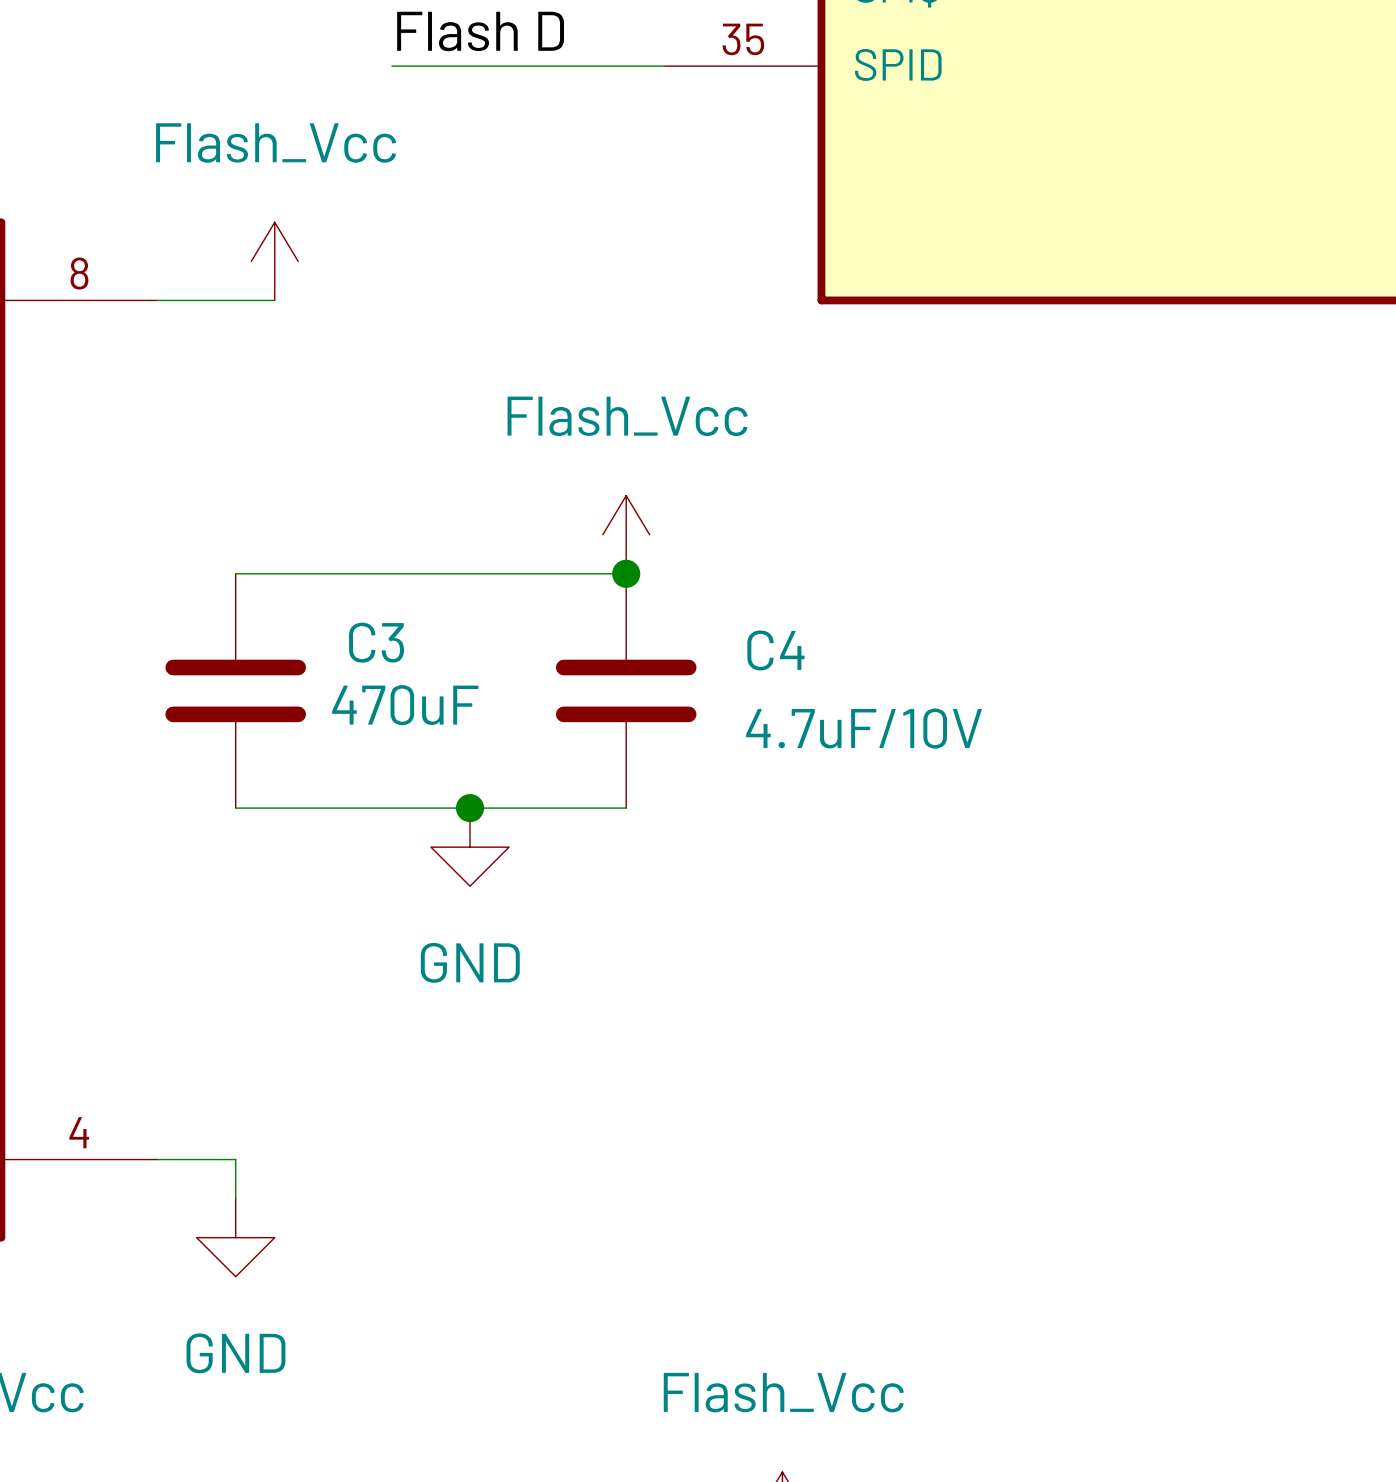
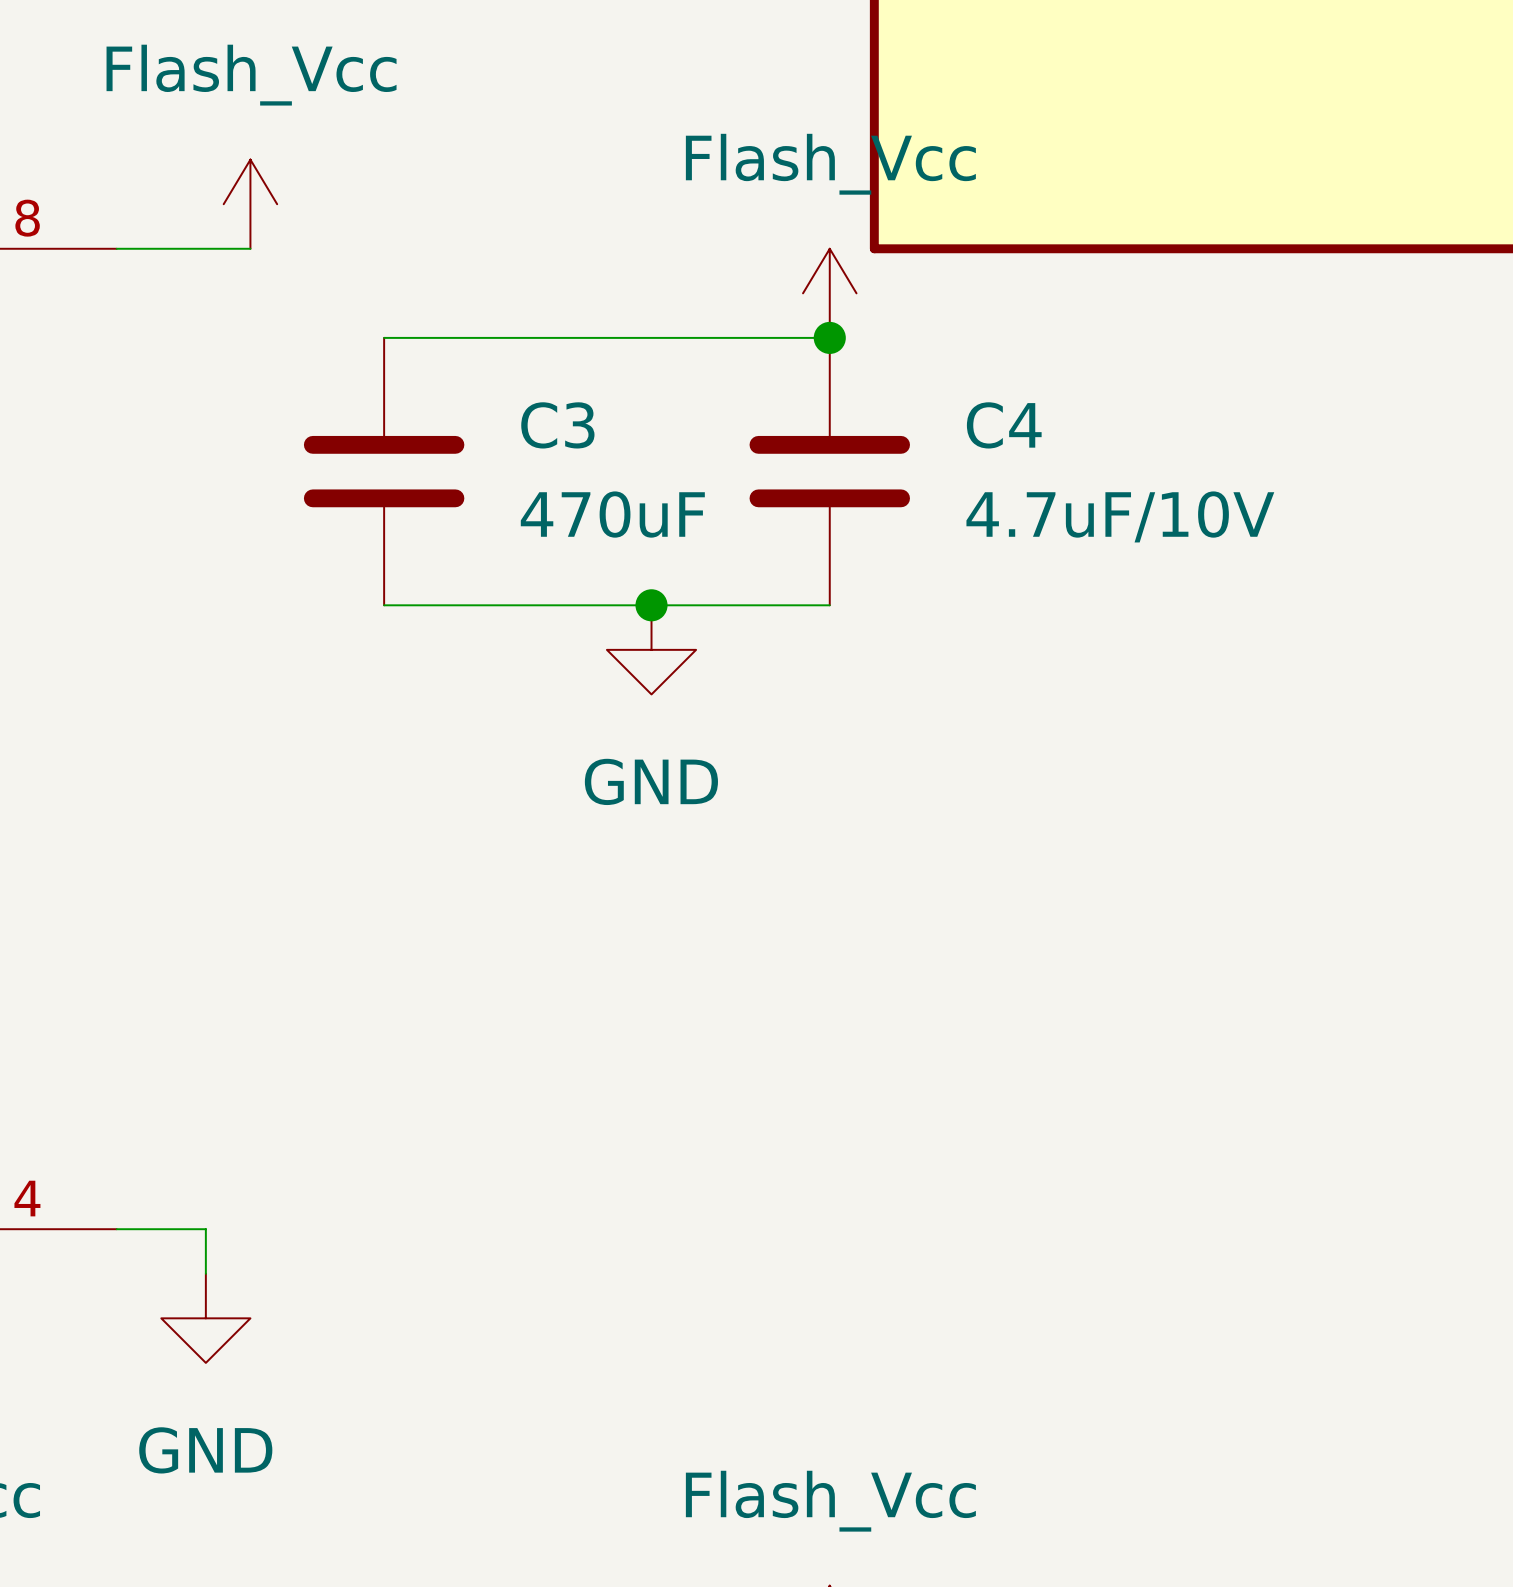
junction: none -> (829, 337)
power symbol position: Flash_Vcc (626, 534) -> Flash_Vcc (829, 293)
wire: (235, 573) (626, 573) -> (384, 337) (829, 337)
junction position: (626, 573) -> (651, 605)
C3 name position: C3 (376, 642) -> C3 (557, 425)
C3 position: (235, 690) -> (384, 471)
C4 position: (626, 690) -> (829, 471)
C3 value position: 470uF (405, 705) -> 470uF (612, 514)
wire: (235, 808) (626, 808) -> (384, 605) (829, 605)
junction: (470, 808) -> none
power symbol position: GND (470, 847) -> GND (651, 649)

